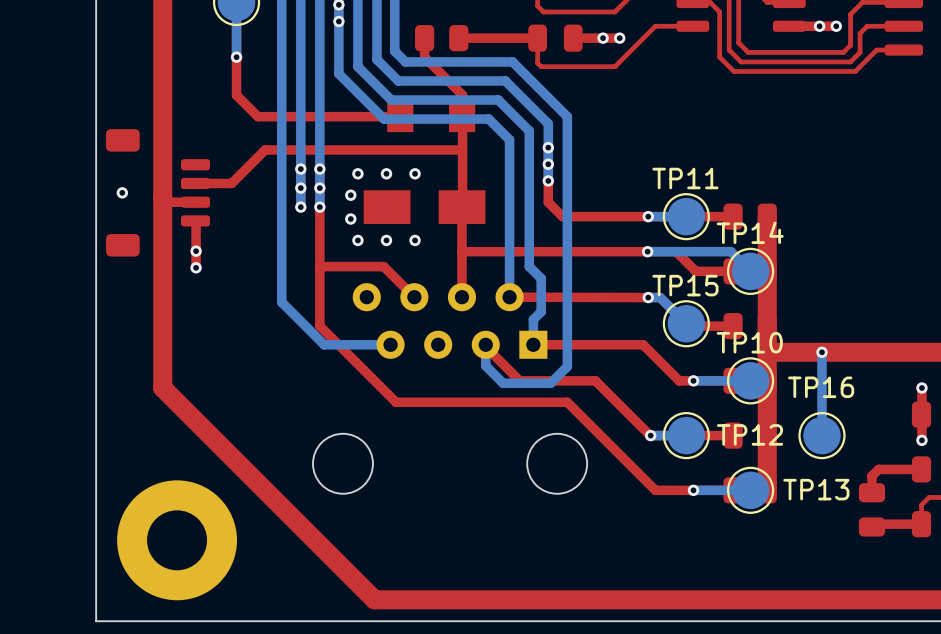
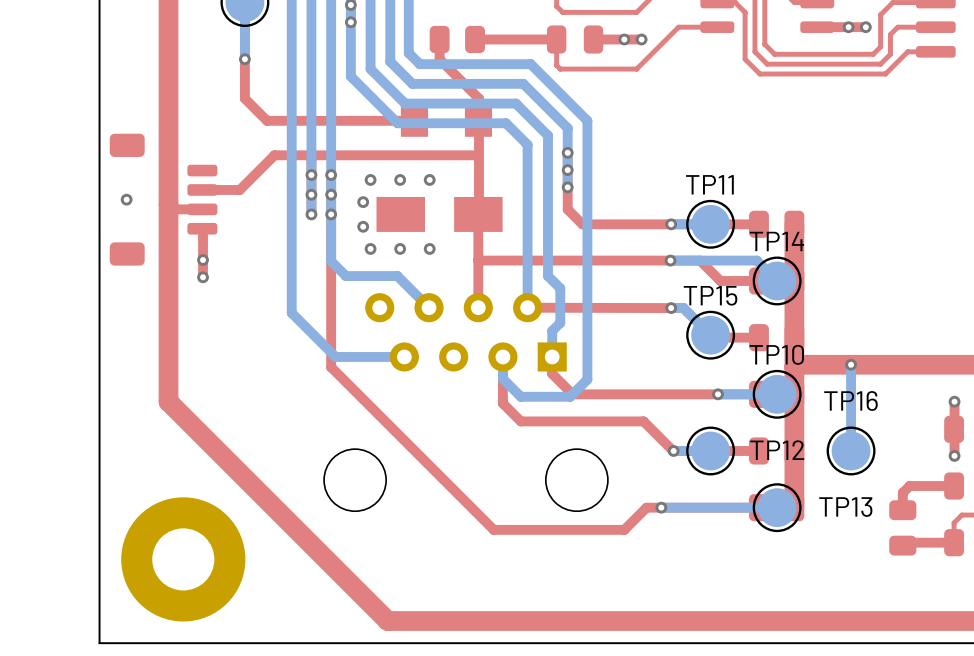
bottom track: none -> (331, 214) (331, 261) (345, 276) (397, 276) (429, 307)
top track: (319, 266) (383, 266) (414, 297) -> none
top track: (319, 326) (396, 402) (567, 402) (655, 490) -> (331, 337) (331, 367) (493, 529) (624, 529) (646, 507) (678, 507)
top track: (533, 344) (643, 344) (679, 380) -> none
top track: (485, 346) (519, 380) (553, 380) -> (552, 356) (552, 373) (572, 394)
top track: none -> (502, 359) (502, 403) (520, 421) (643, 421)
top track: (595, 380) (621, 407) -> (616, 394) (703, 394)
bottom track: none -> (718, 507) (661, 507)
via position: (693, 490) -> (661, 507)

